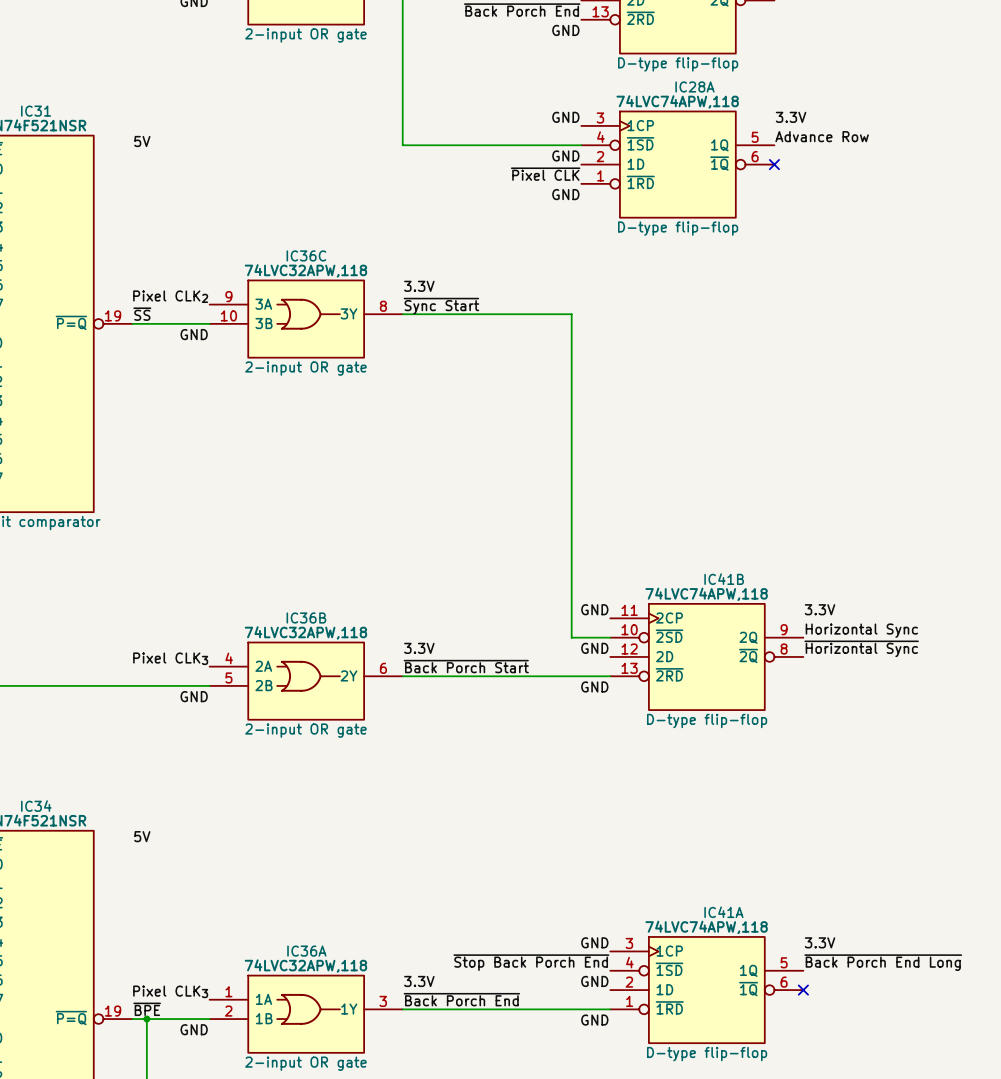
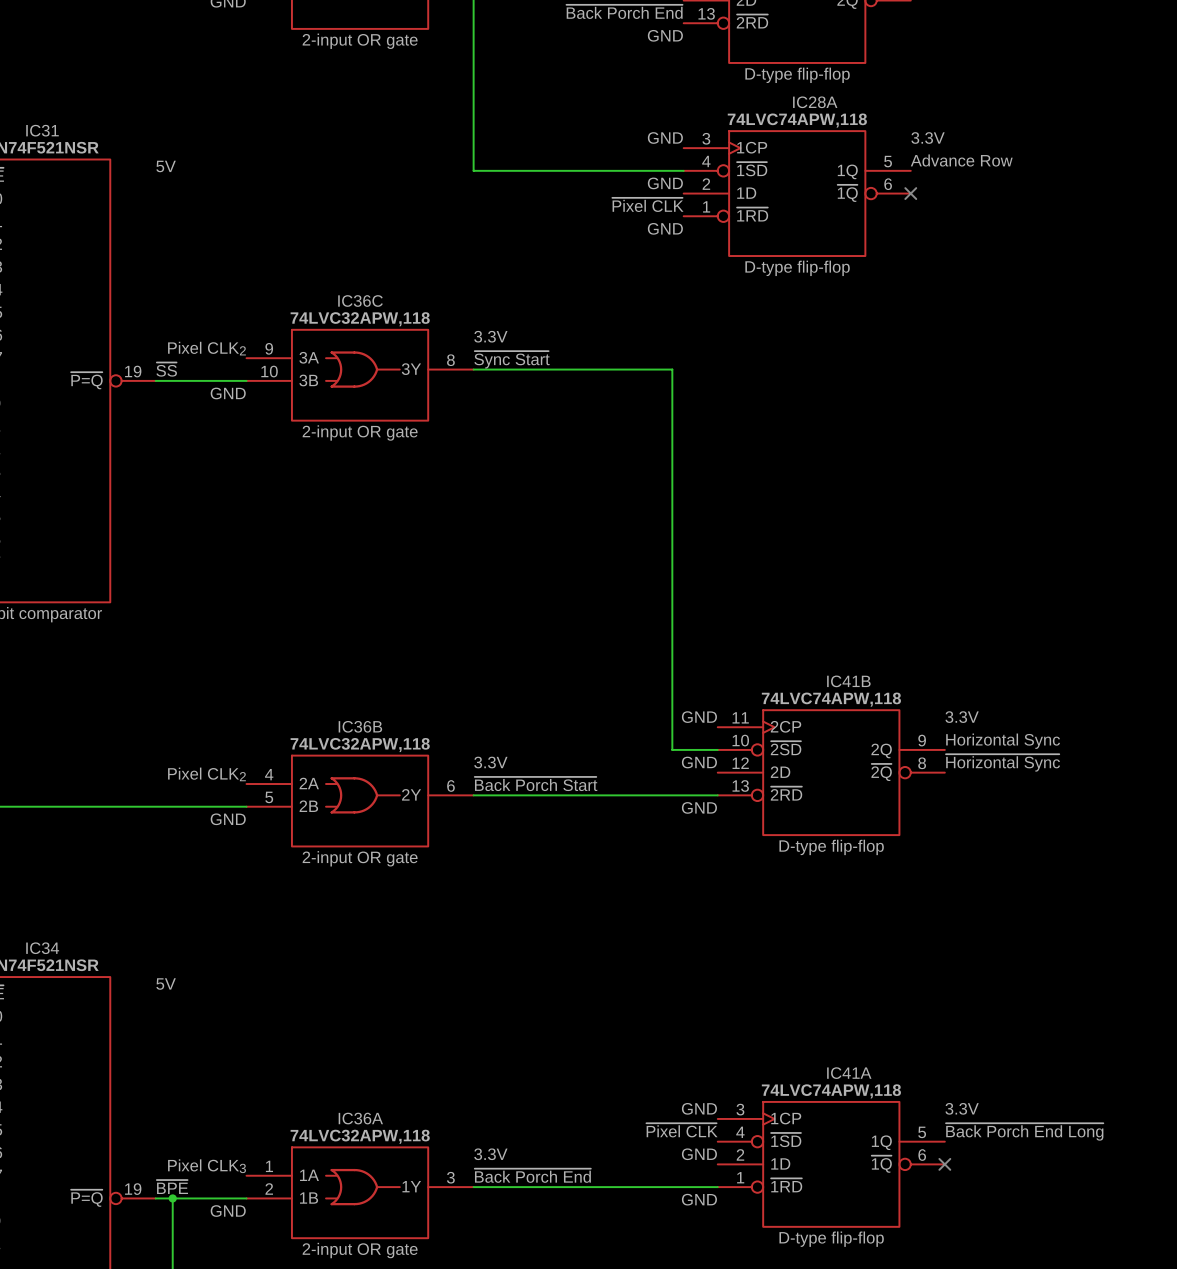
label: Pixel CLK3 (170, 658) -> Pixel CLK2 (206, 774)
label: ~{Stop Back Porch End} (531, 962) -> ~{Pixel CLK} (681, 1130)

